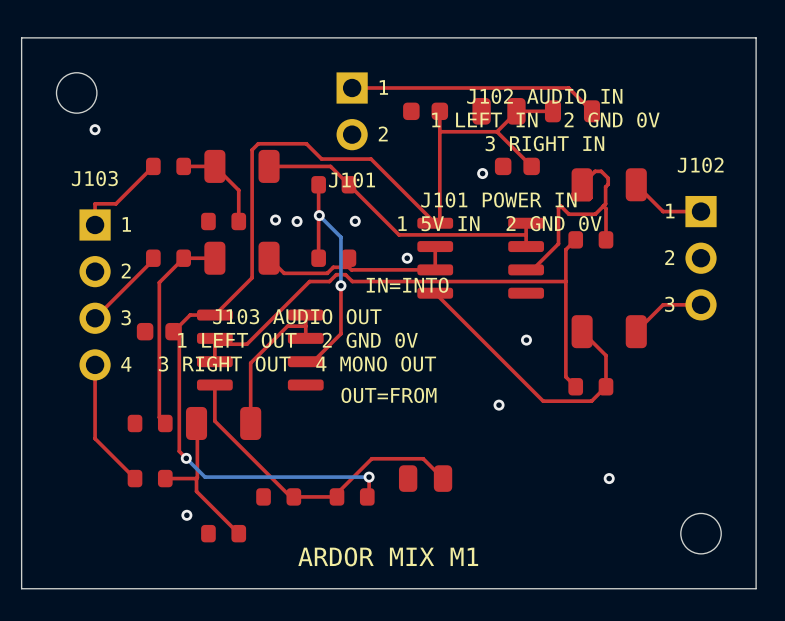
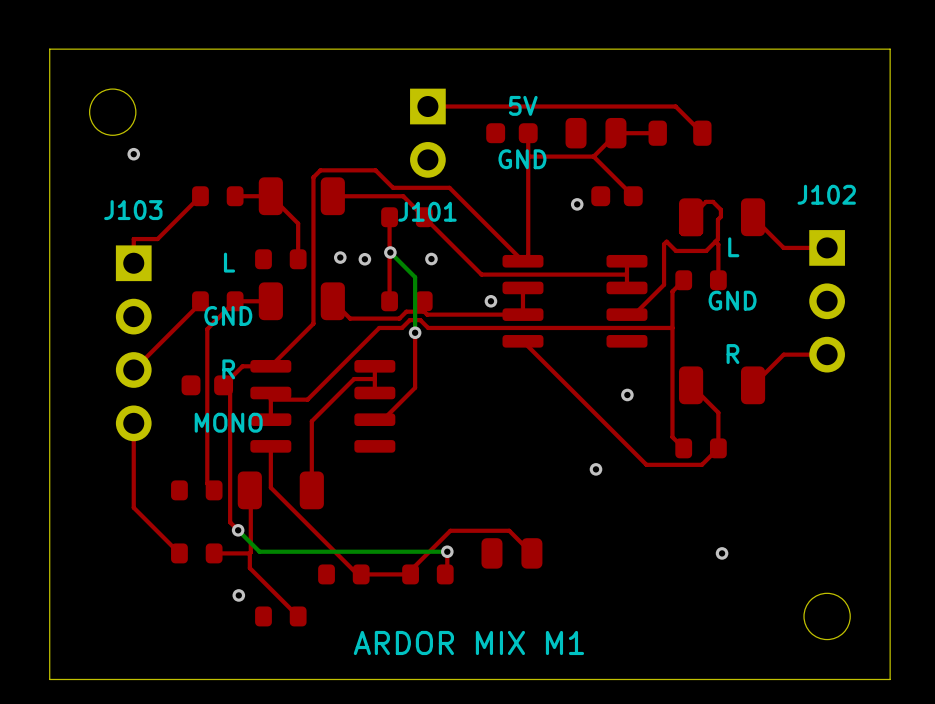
text: 1 (383, 87) -> none
text: none -> 5V (523, 105)
text: J102 AUDIO IN (544, 96) -> none
text: 1 LEFT IN 2 GND 0V (545, 119) -> none
text: 2 (383, 133) -> none
text: none -> GND (522, 159)
text: 3 RIGHT IN (544, 143) -> none
text: J101 POWER IN (498, 199) -> none
text: none -> L (733, 247)
text: 1 (670, 211) -> none
text: 1 5V IN 2 GND 0V (499, 223) -> none
text: 1 (126, 224) -> none
text: none -> L (229, 262)
text: none -> GND (732, 300)
text: 2 (669, 257) -> none
text: 2 (126, 270) -> none
text: none -> GND (228, 315)
text: IN=INTO (407, 285) -> none
text: none -> R (732, 354)
text: 3 (669, 304) -> none
text: J103 AUDIO OUT (297, 316) -> none
text: 3 (126, 317) -> none
text: none -> R (228, 369)
text: 1 LEFT OUT 2 GND 0V (297, 340) -> none
text: 3 RIGHT OUT 4 MONO OUT (297, 363) -> none
text: 4 (126, 364) -> none
text: none -> MONO (228, 422)
text: OUT=FROM (389, 395) -> none

